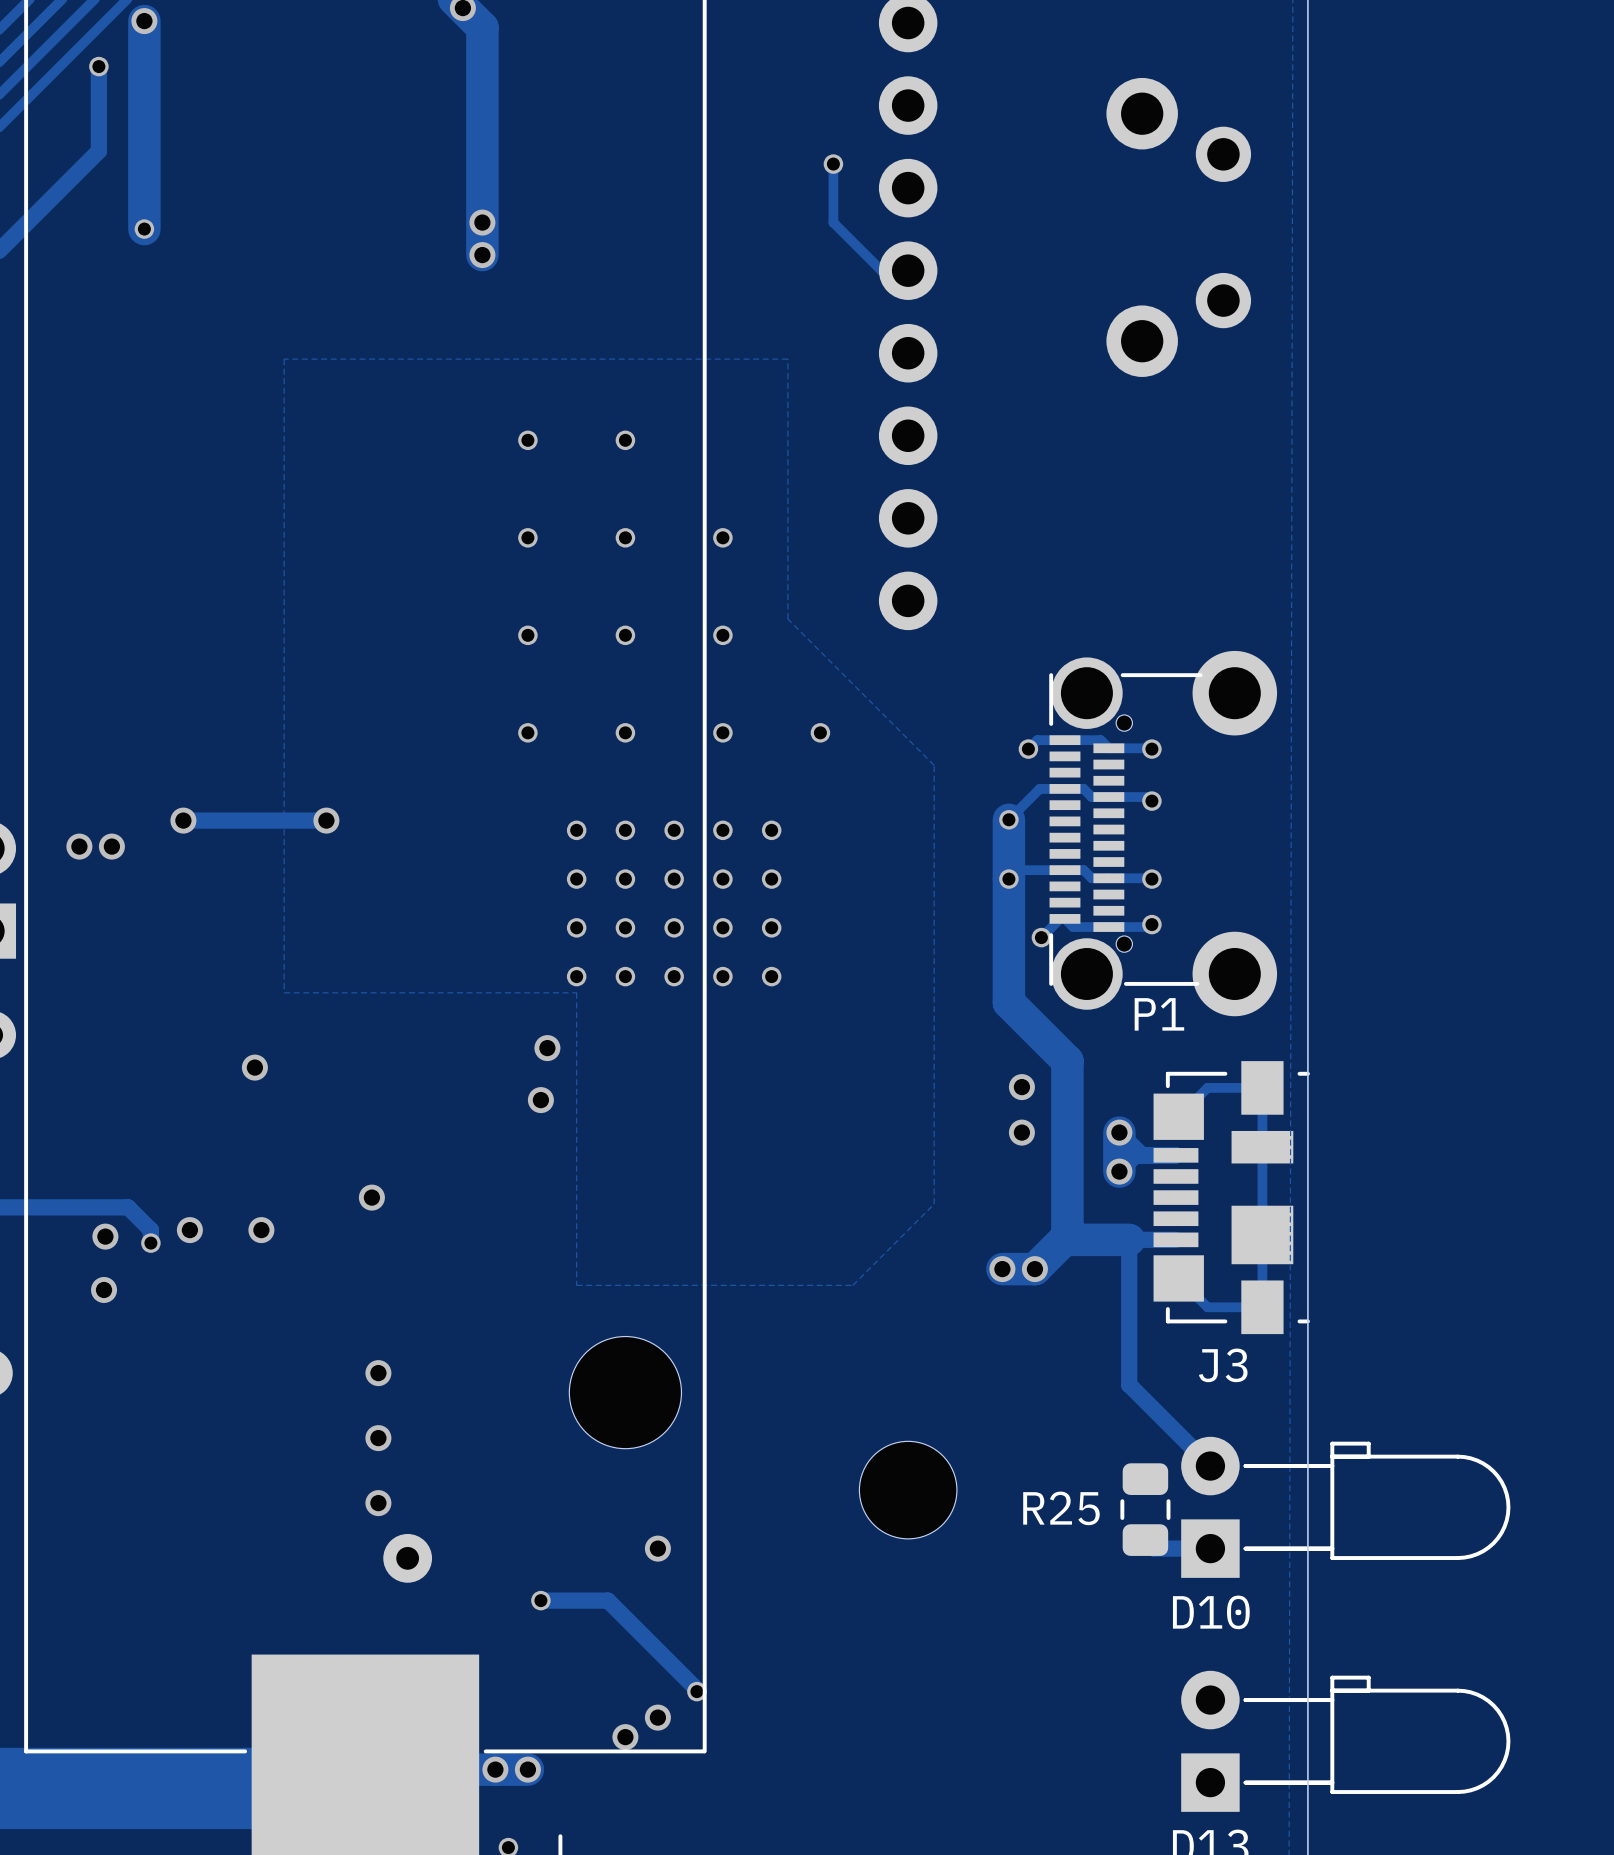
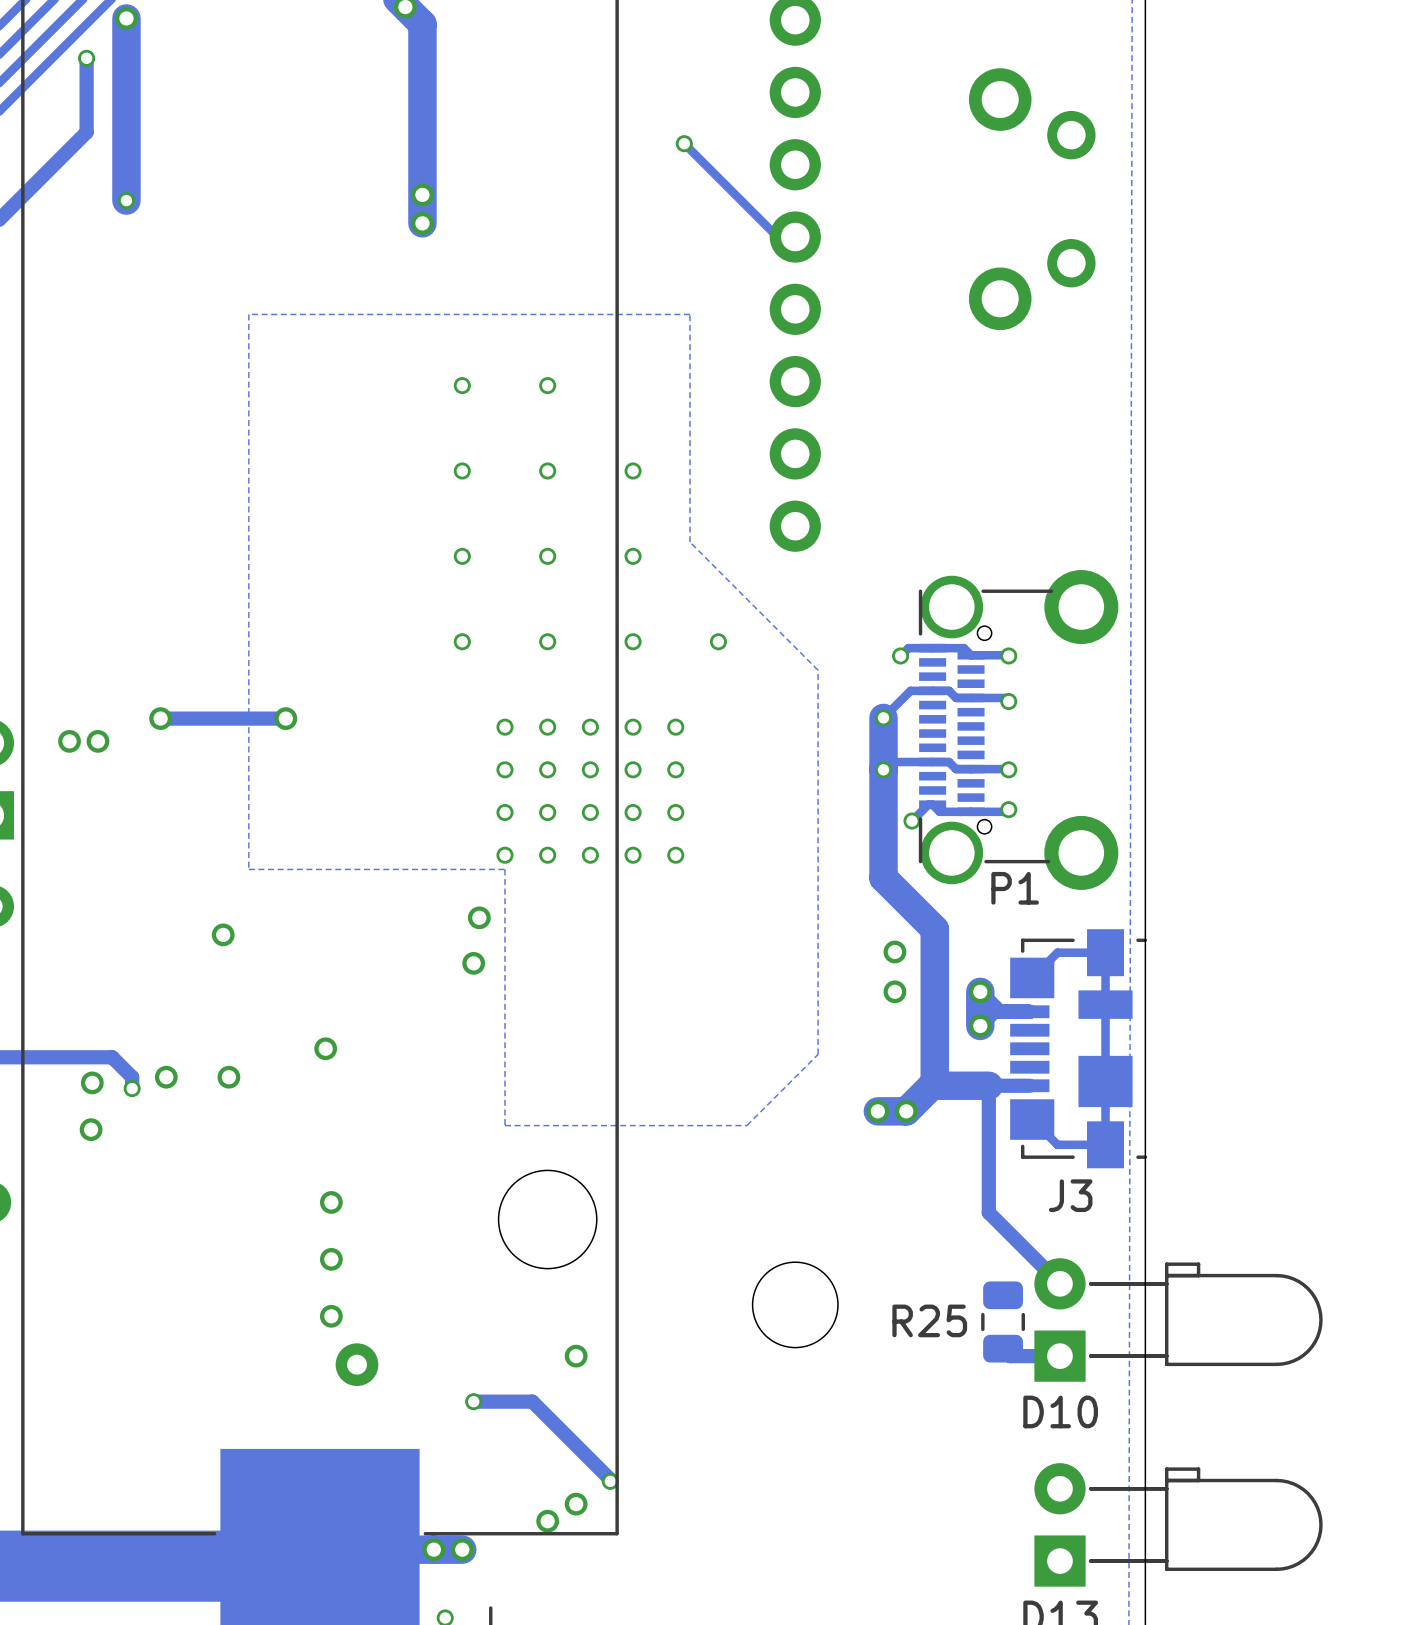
track: (833, 164) (833, 222) (881, 270) (888, 270) -> (684, 143) (777, 237)
via position: (833, 164) -> (684, 143)

